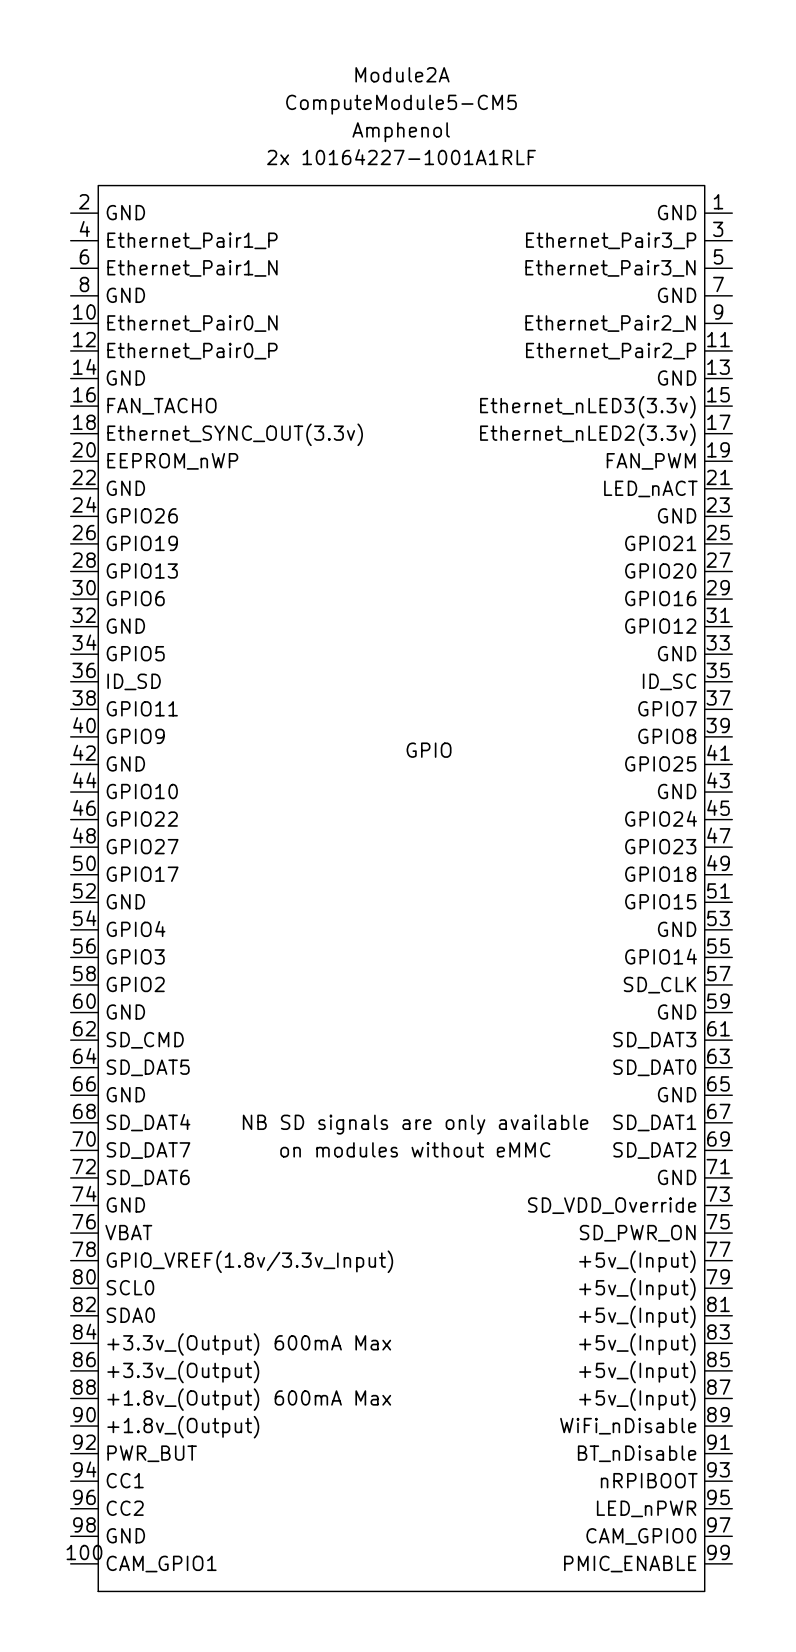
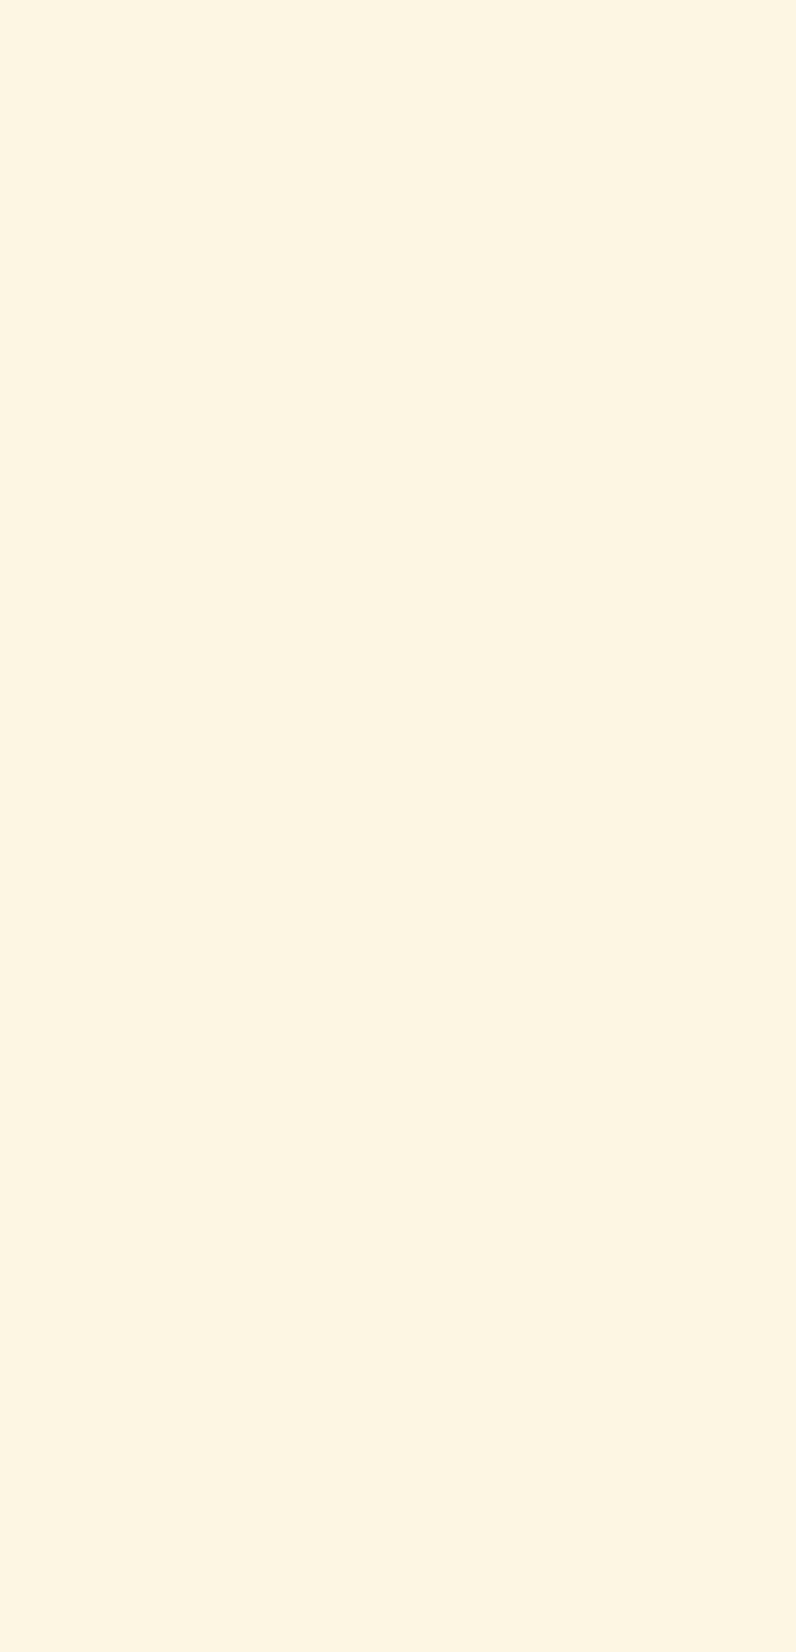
Module2A: ComputeModule5-CM5 (401, 888) -> none

